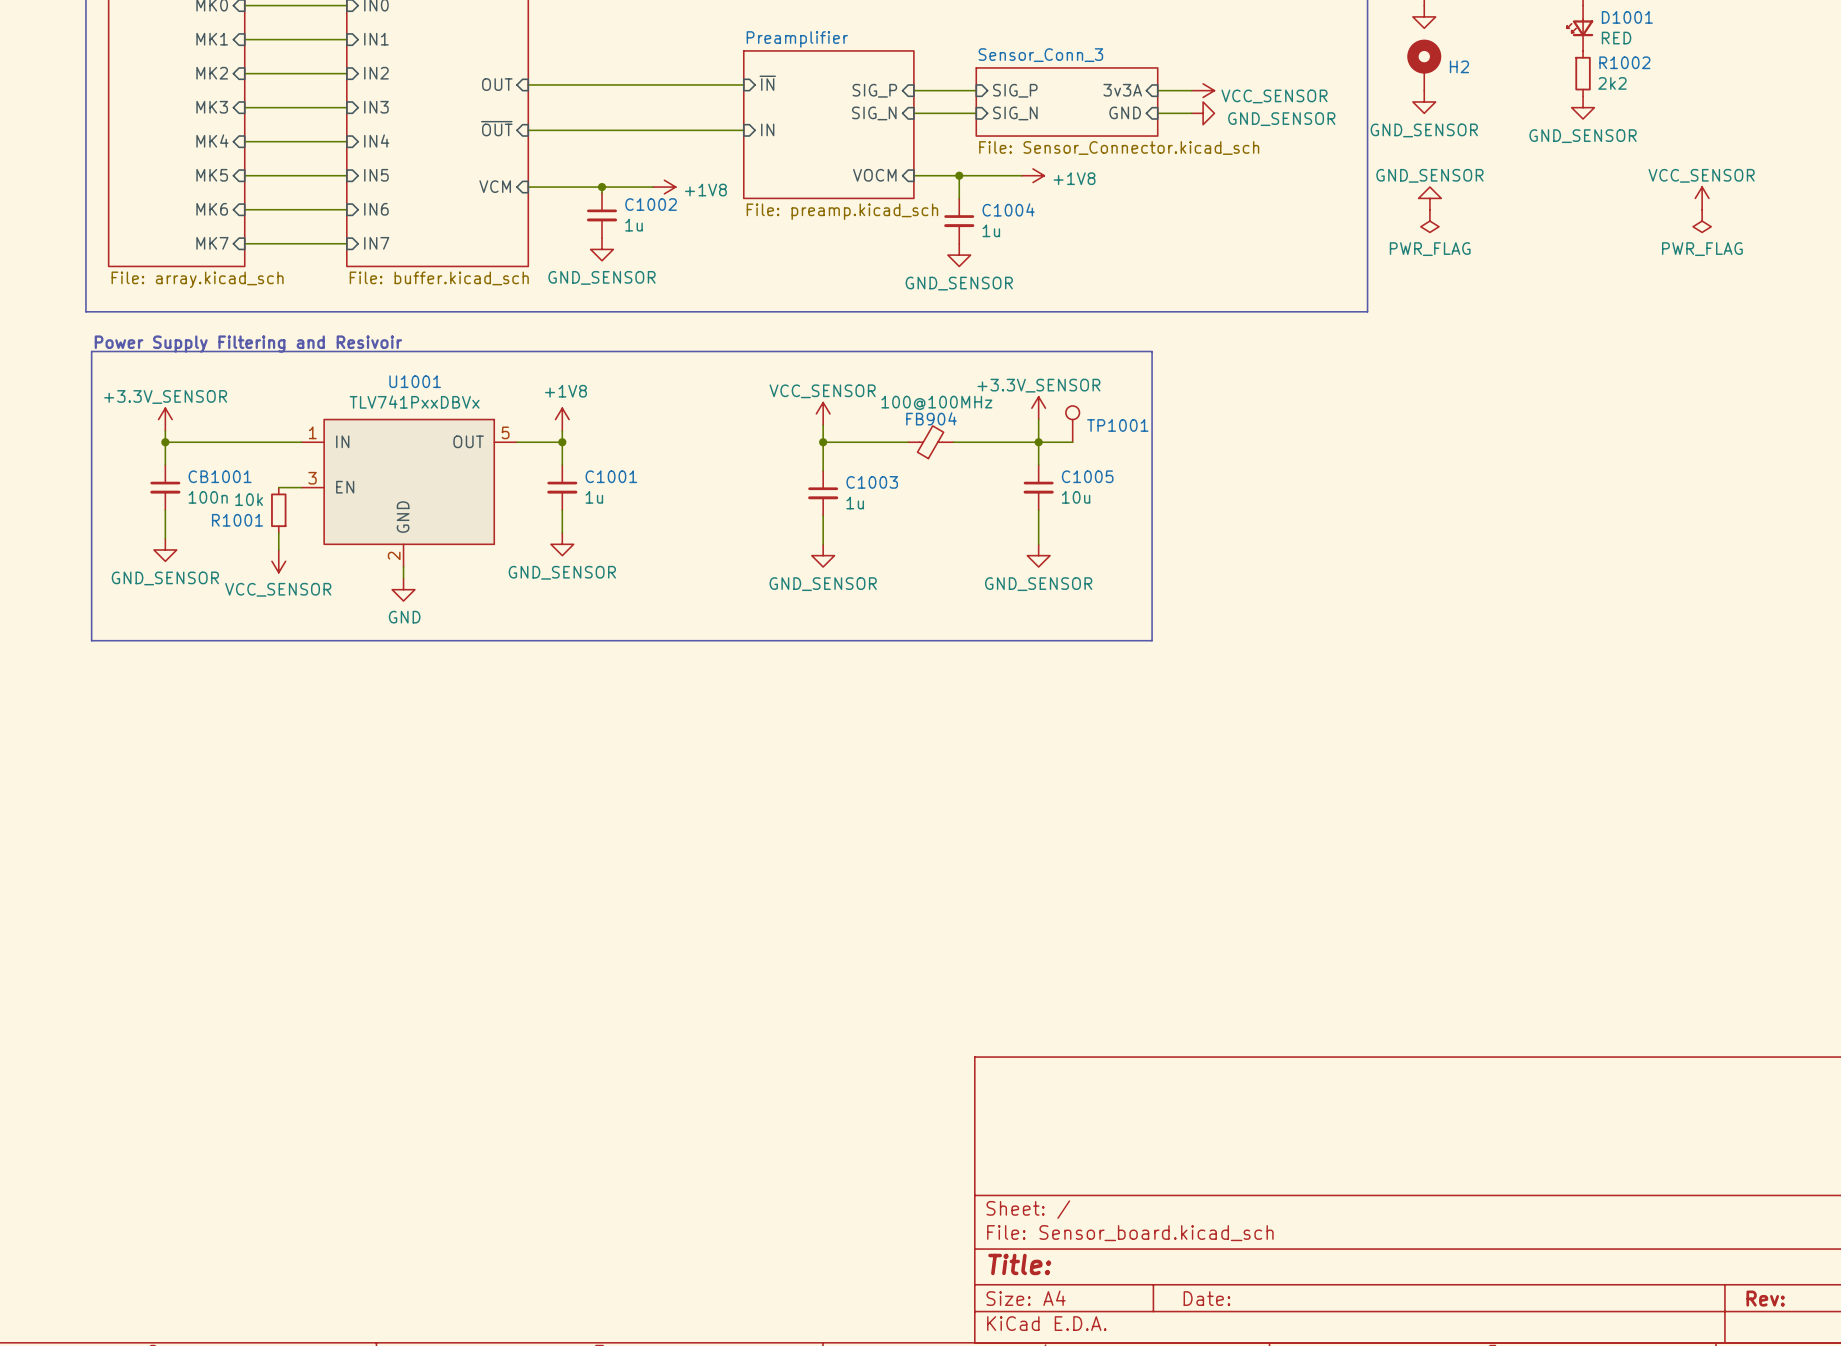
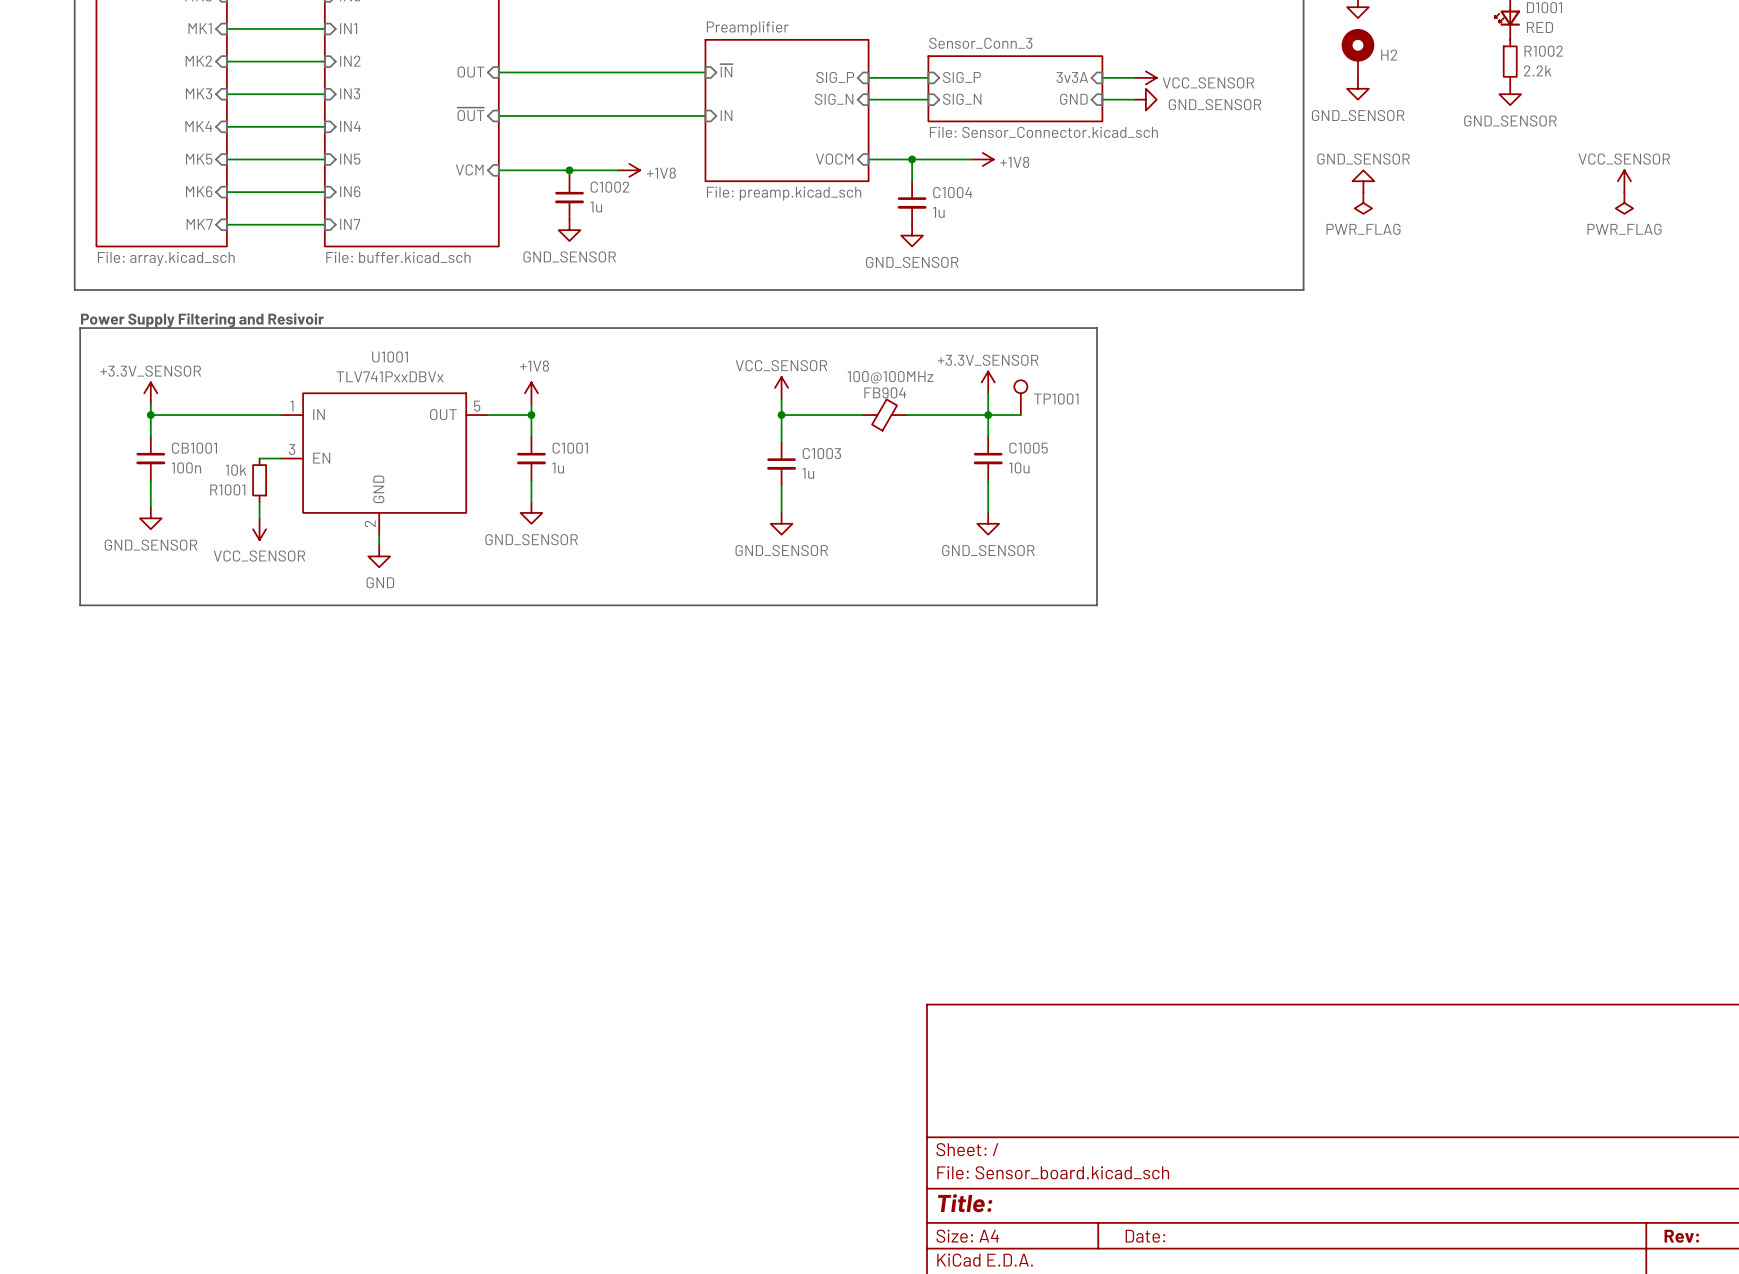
R1002 value: 2k2 (1612, 83) -> 2.2k (1537, 70)

